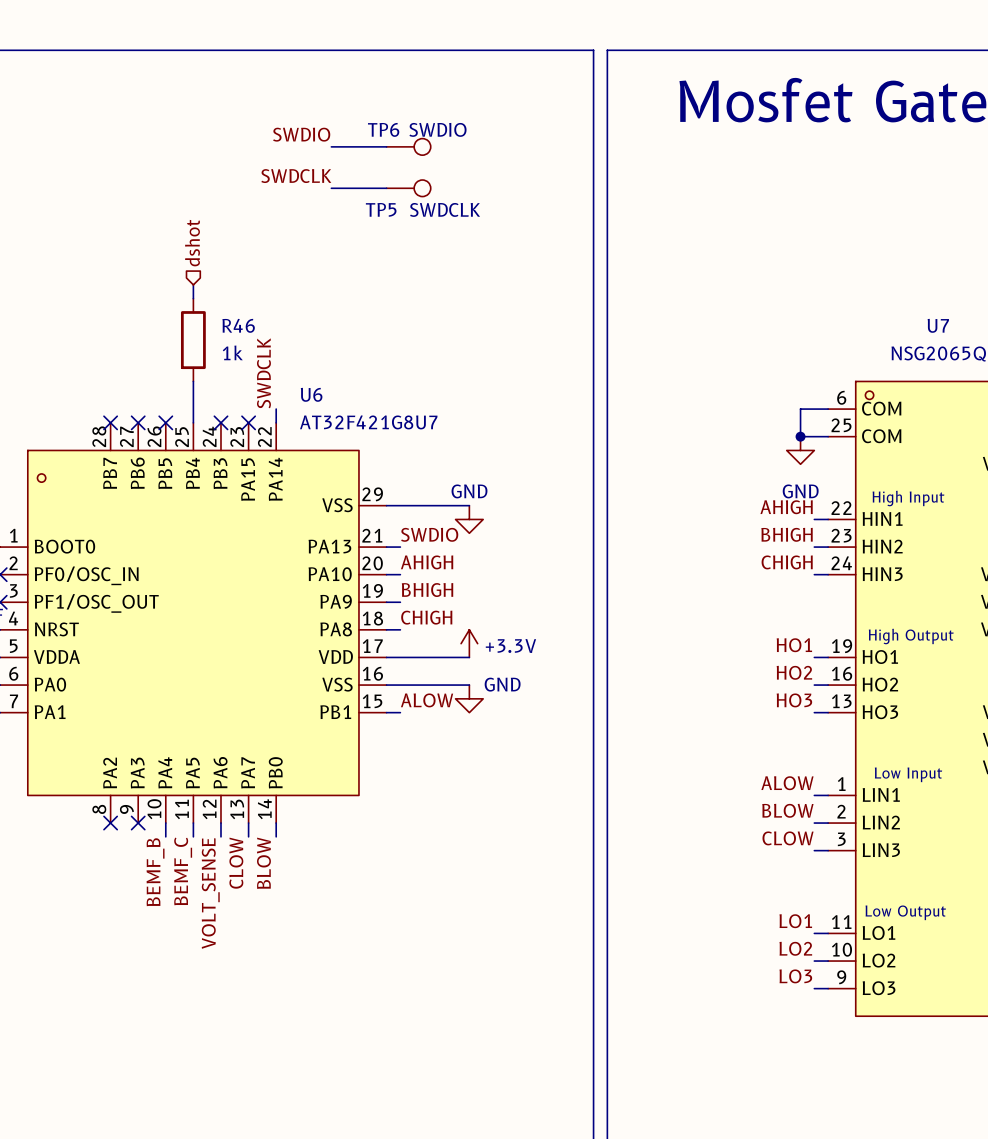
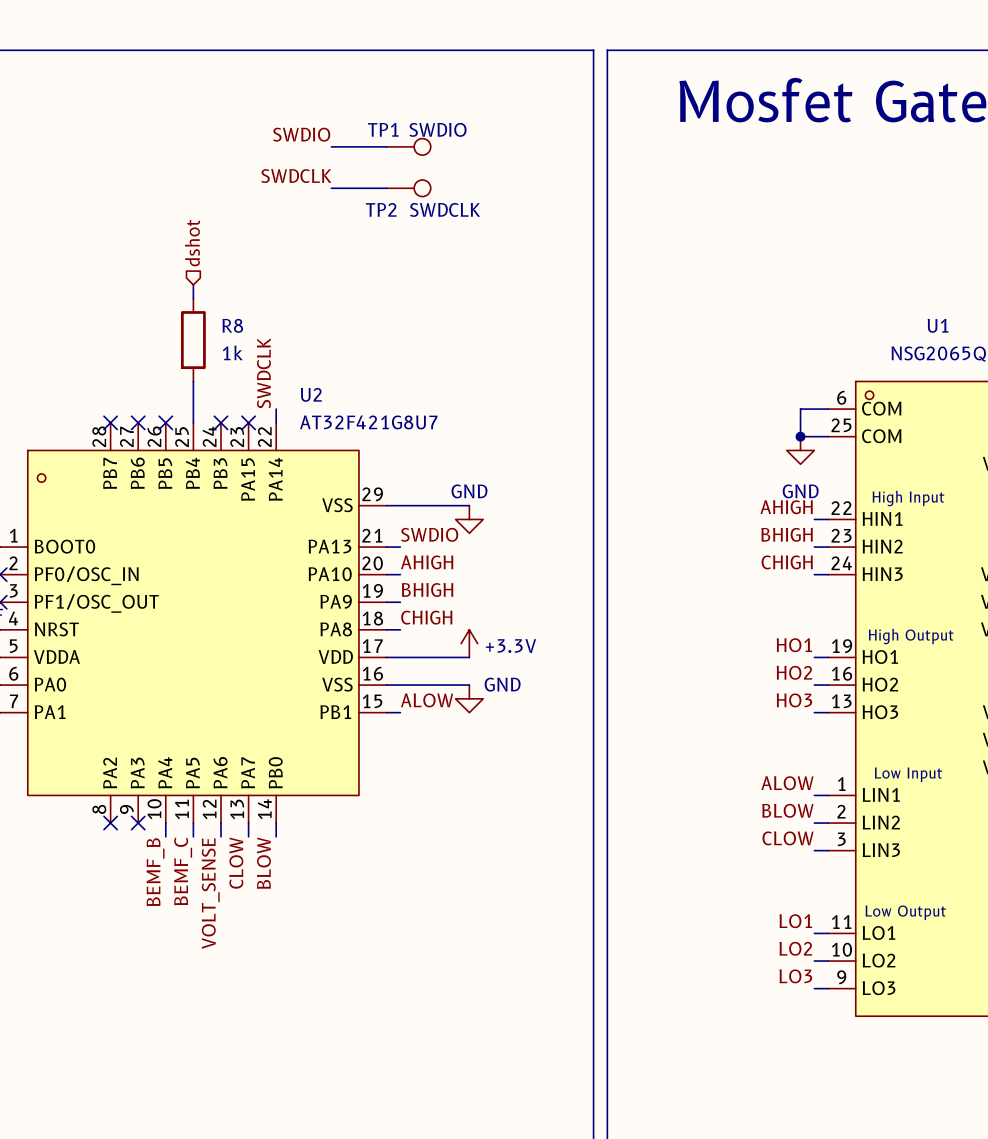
TP6 name: TP6 (383, 129) -> TP1 (383, 129)
TP5 name: TP5 (381, 209) -> TP2 (381, 209)
R46 name: R46 (238, 325) -> R8 (232, 325)
U7 name: U7 (938, 325) -> U1 (938, 325)
U6 name: U6 (311, 394) -> U2 (311, 394)

